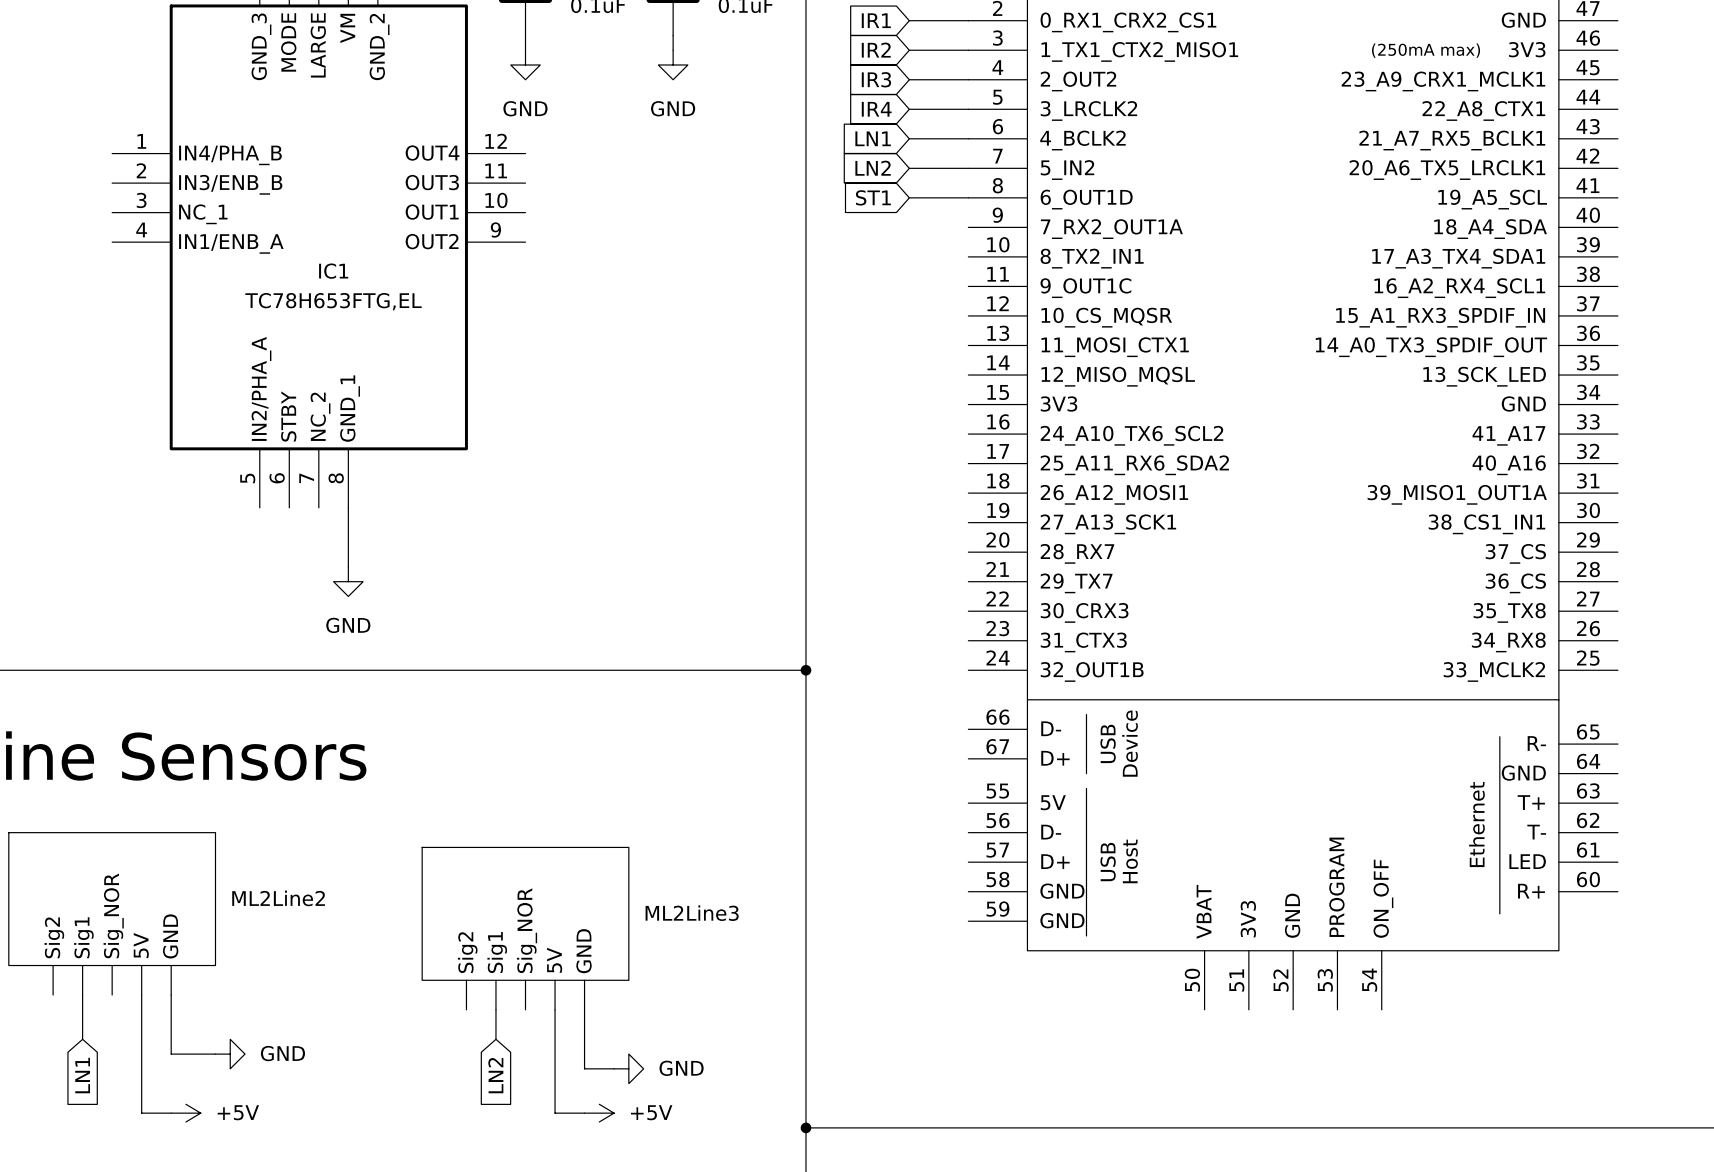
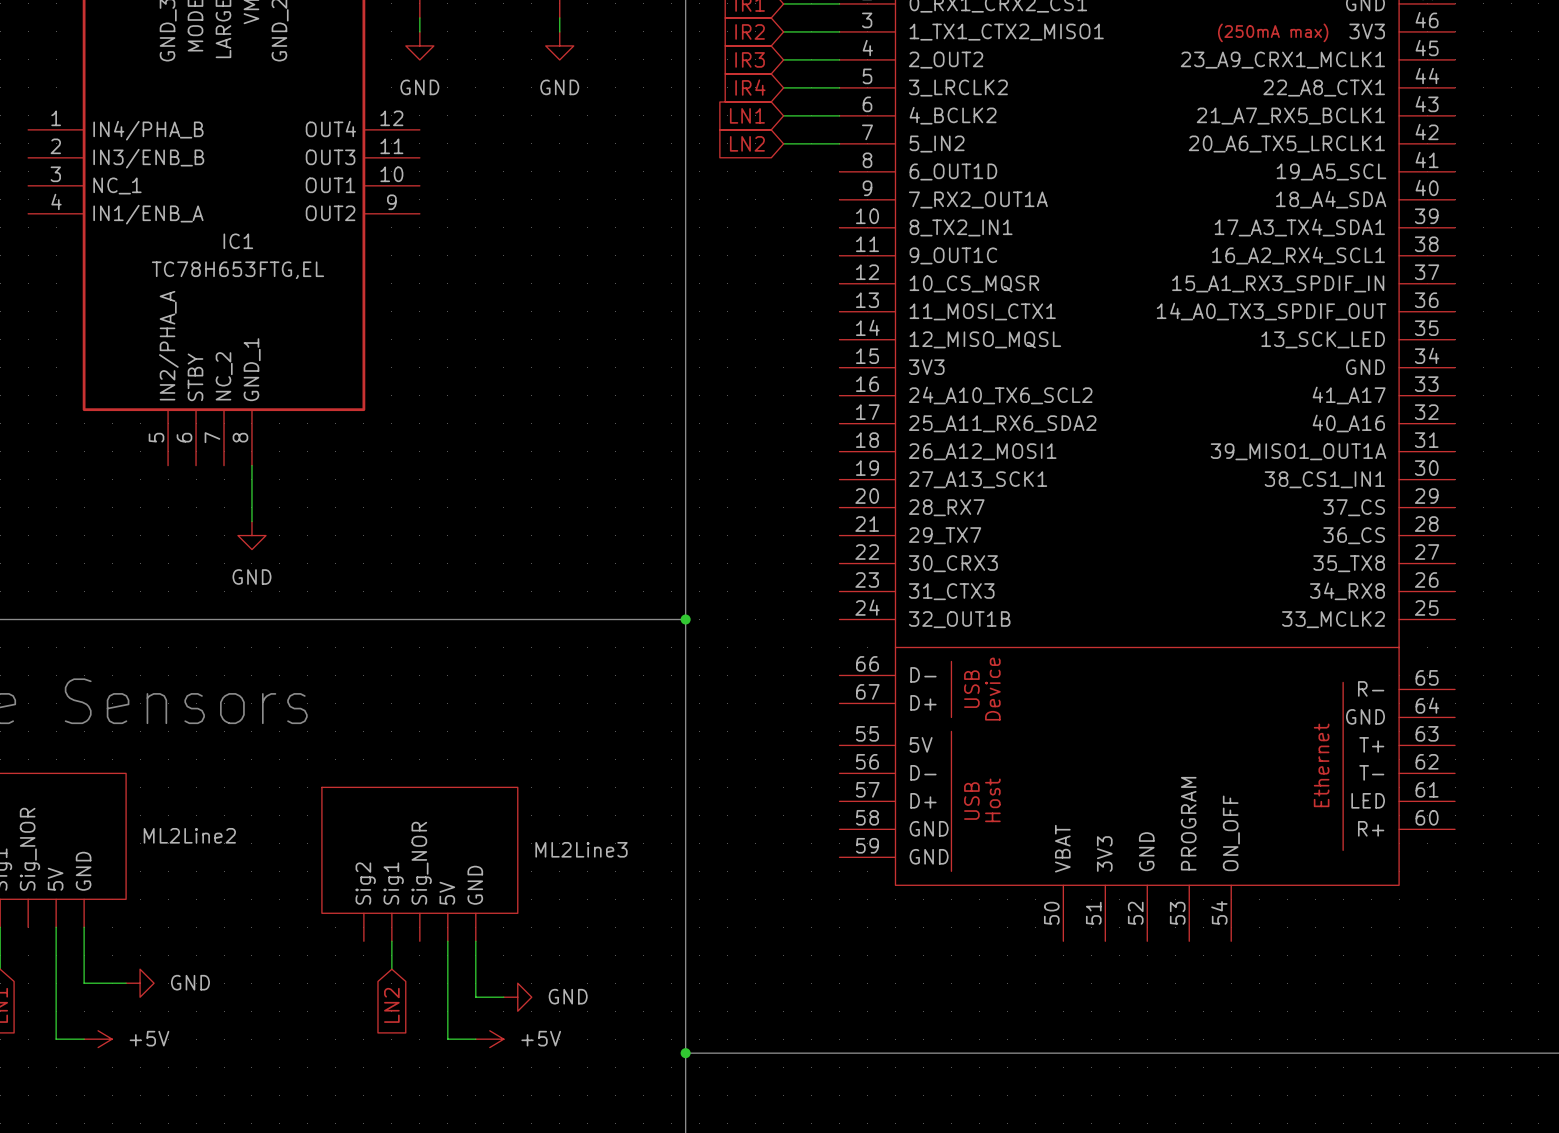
global label: ST1 (873, 197) -> none
wire: (909, 197) (968, 197) -> none

